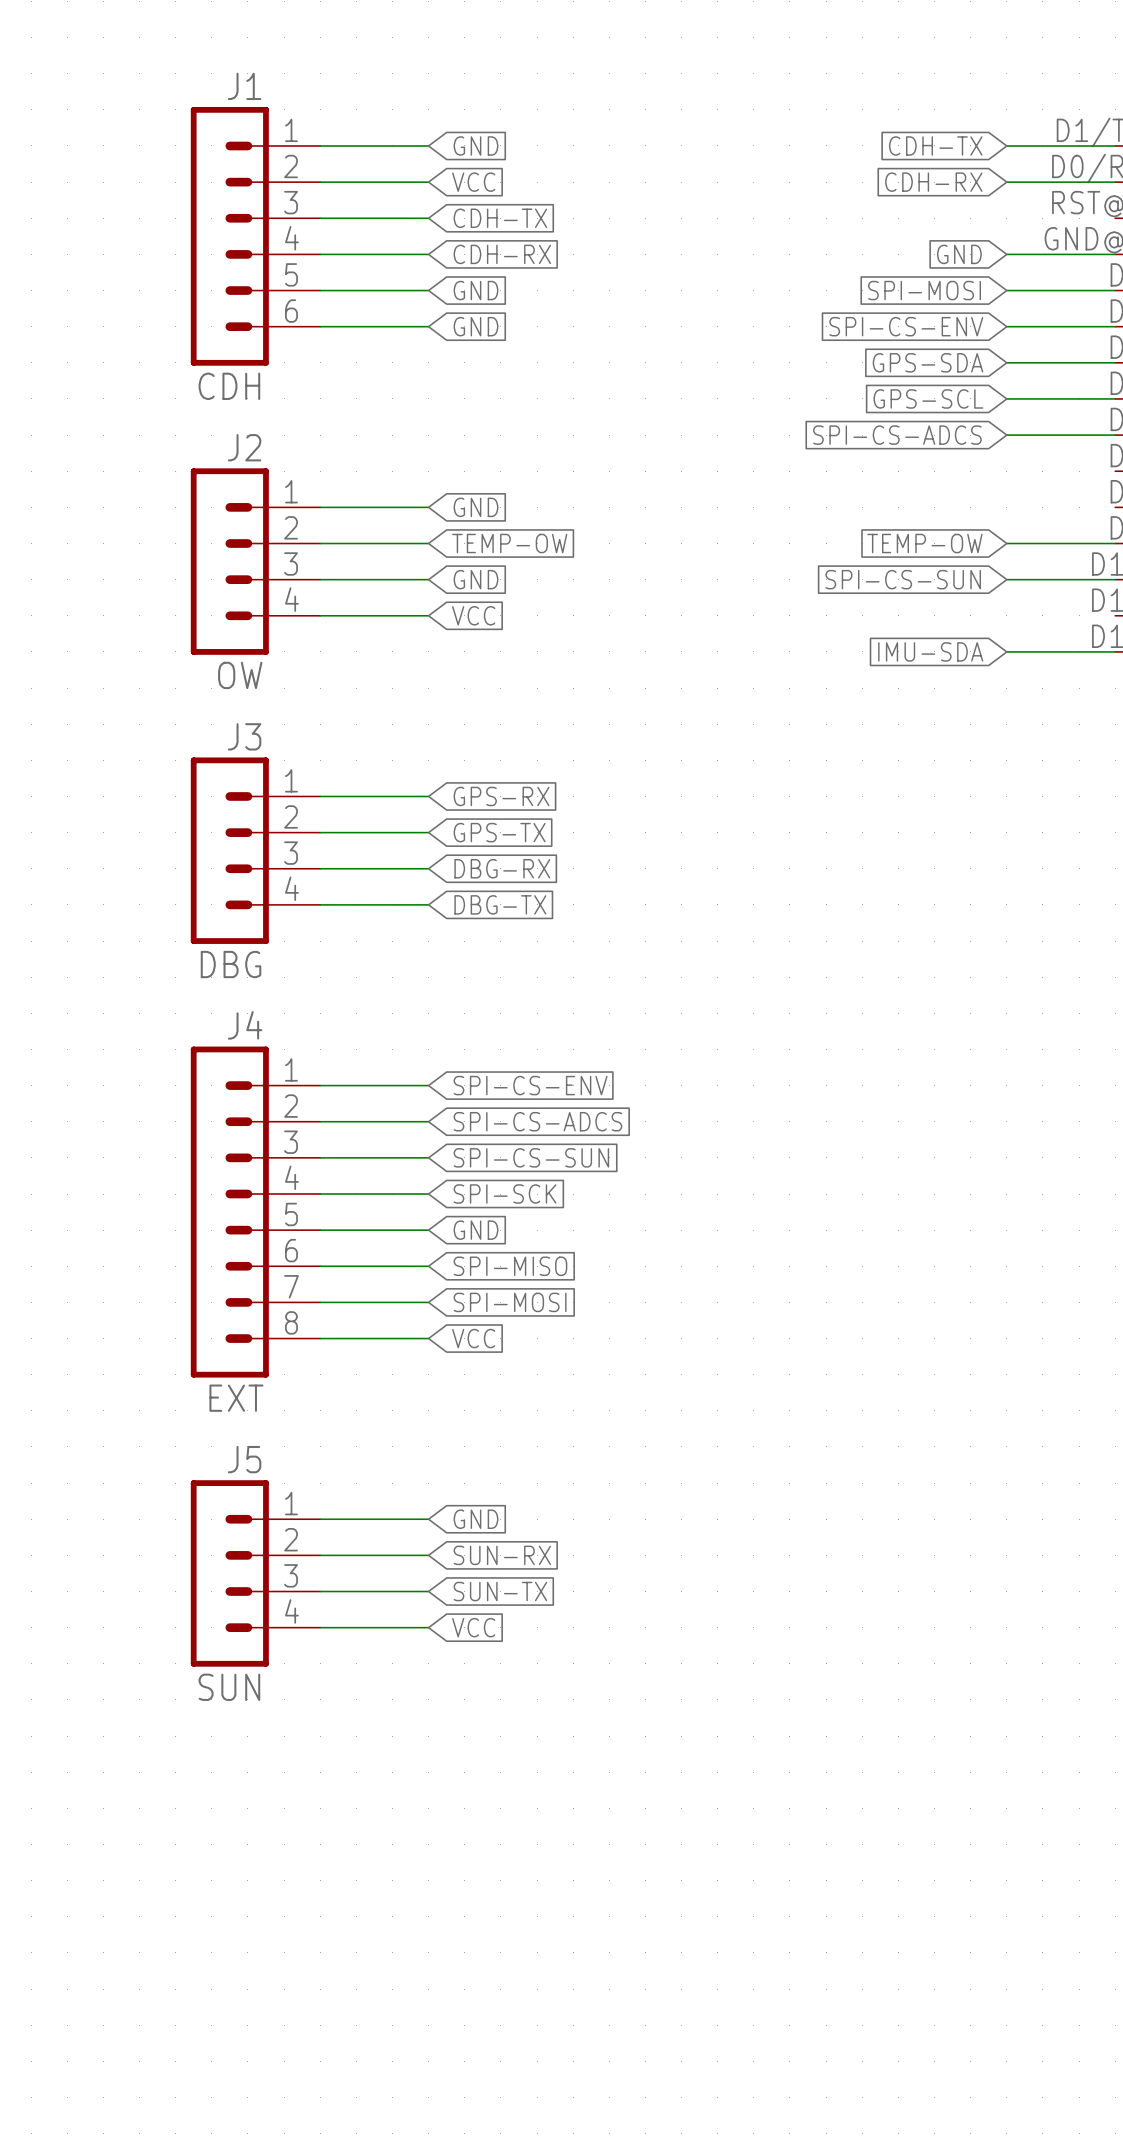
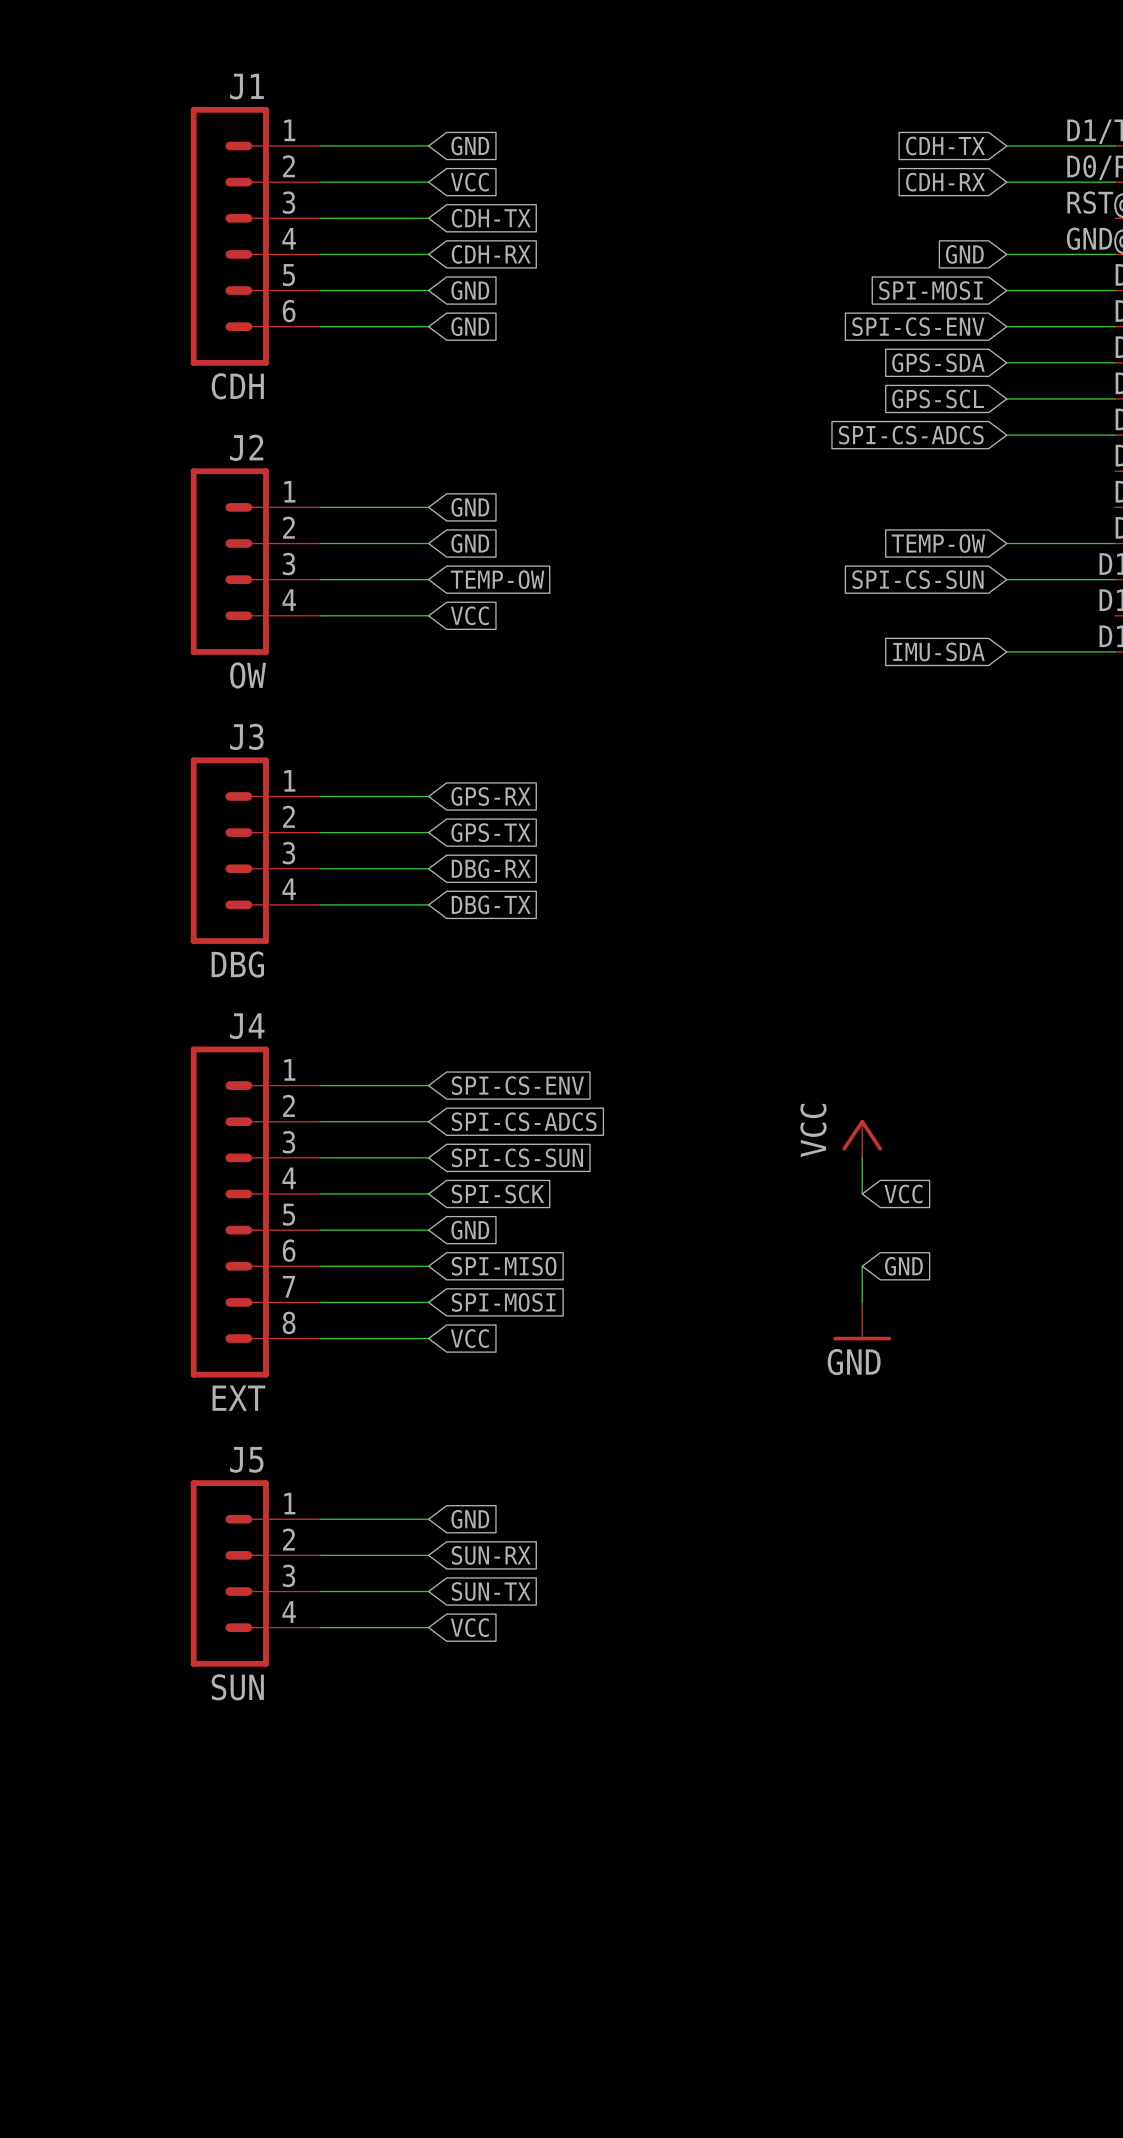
global label: TEMP-OW (509, 543) -> GND (470, 543)
global label: GND (476, 579) -> TEMP-OW (497, 579)
power symbol: none -> VCC (862, 1138)
wire: none -> (862, 1157) (862, 1194)
global label: none -> VCC (903, 1194)
wire: none -> (862, 1266) (862, 1302)
global label: none -> GND (903, 1266)
power symbol: none -> GND (862, 1321)

